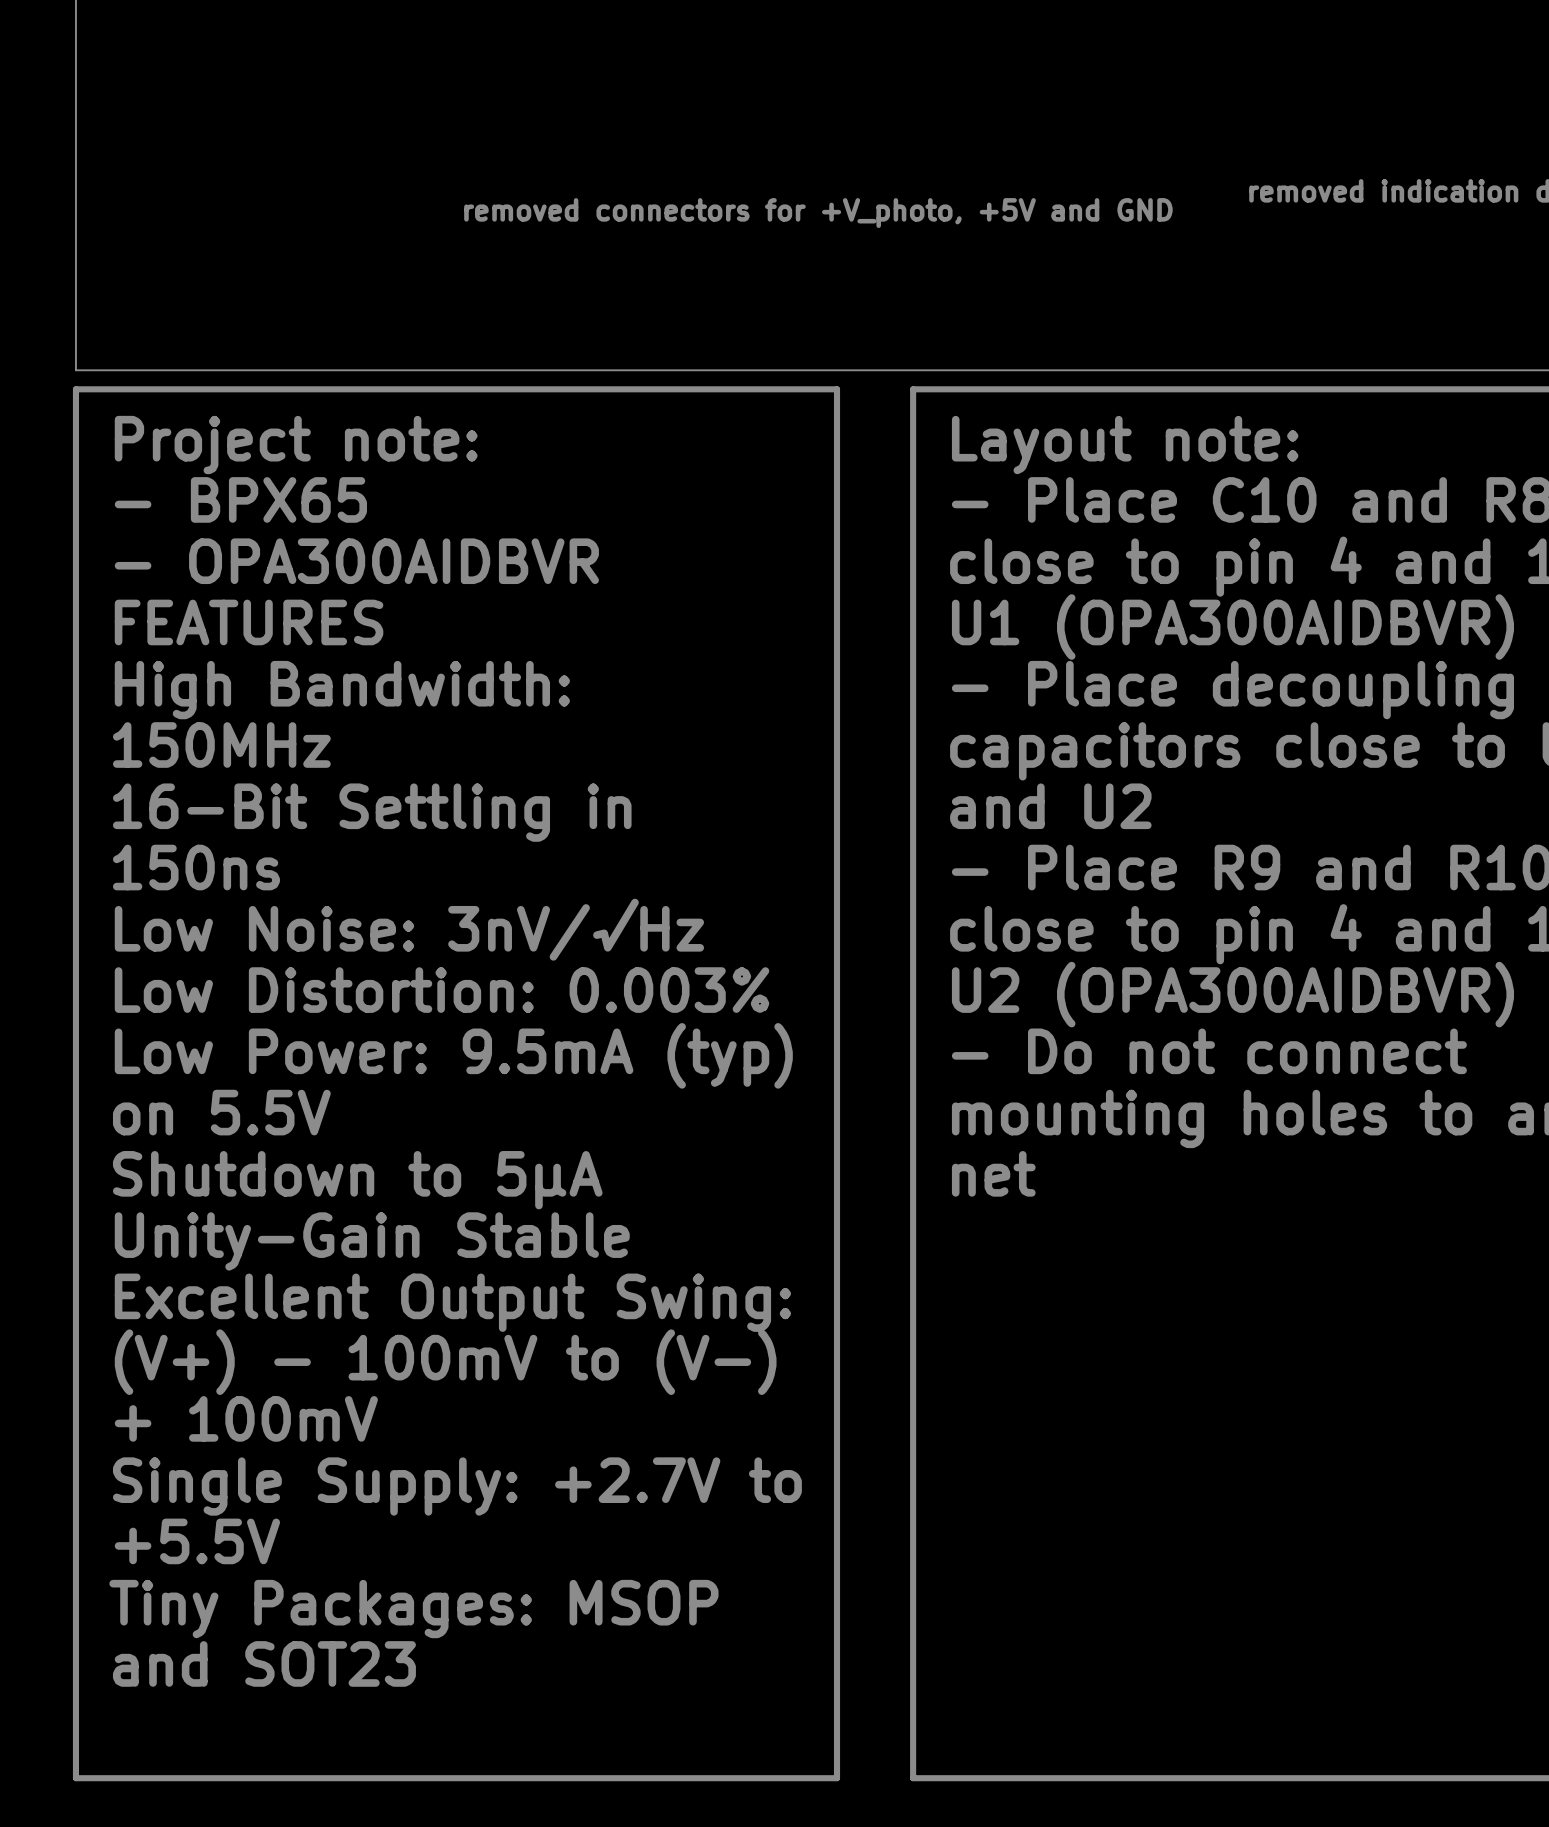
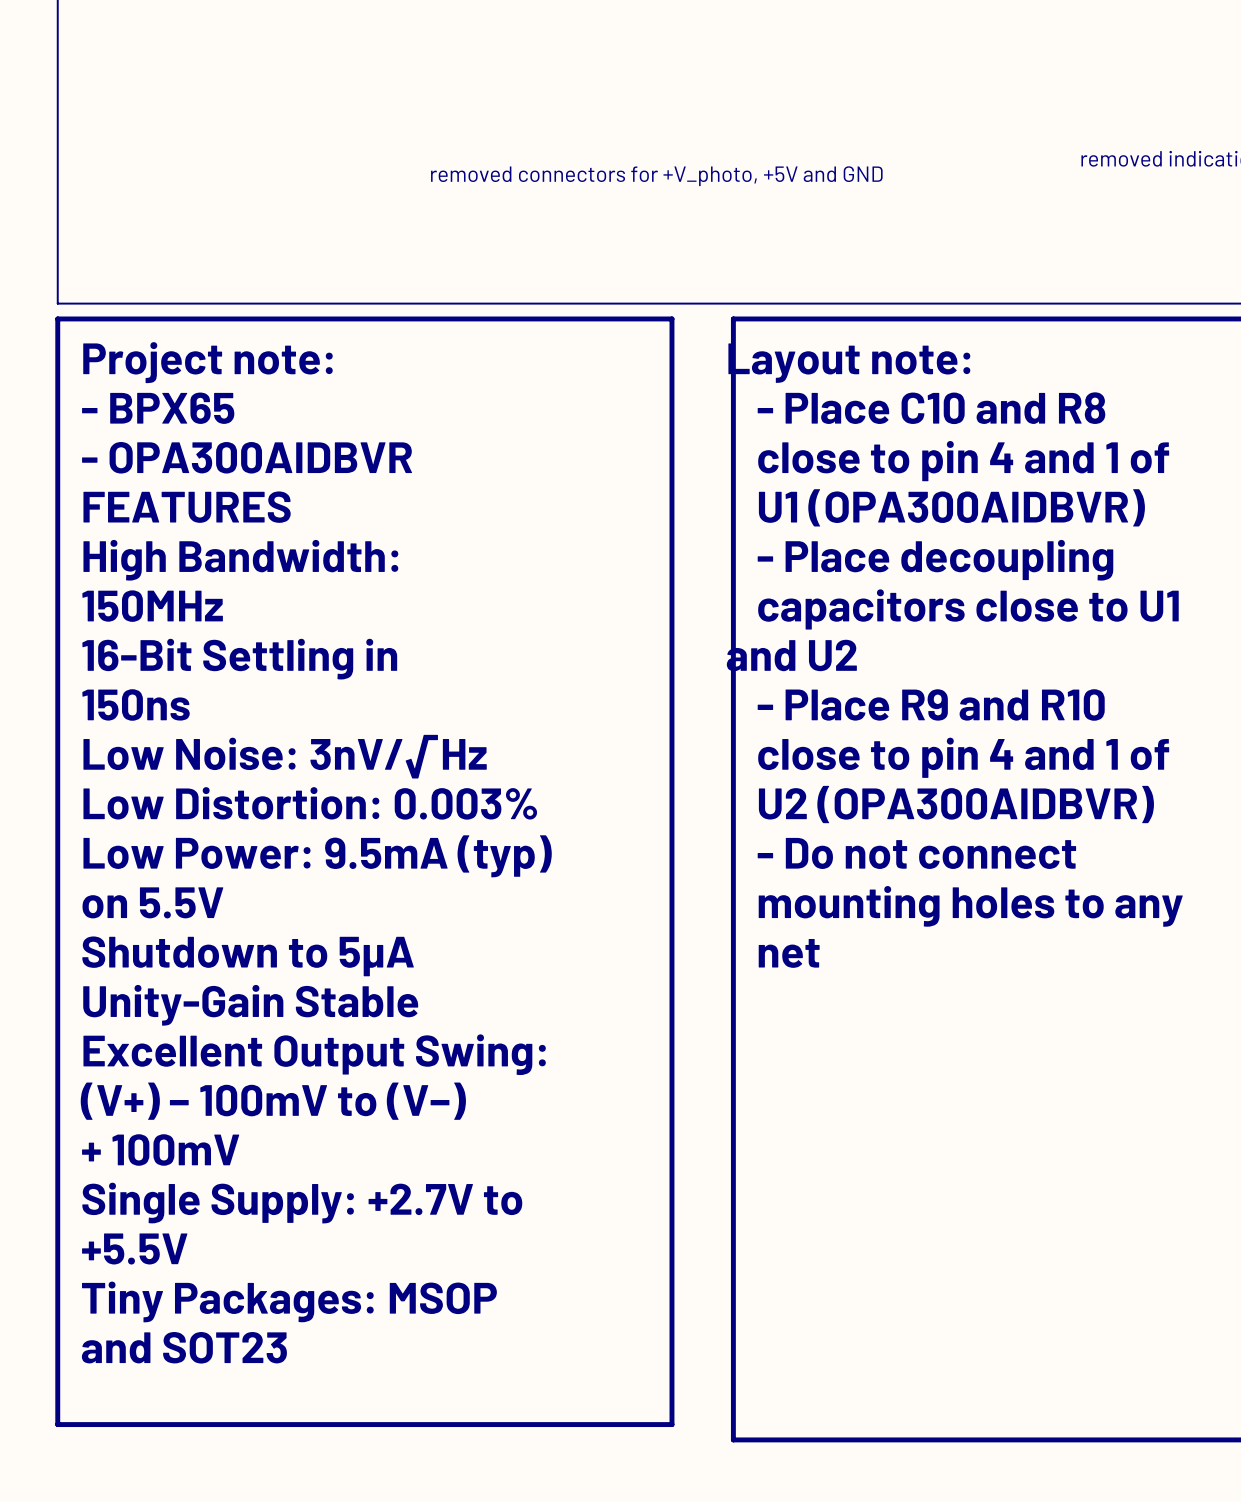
text position: Layout note: (1125, 445) -> Layout note: (849, 363)
text position: and U2 (1050, 806) -> and U2 (791, 655)
line: (75, 1759) (75, 1778) (837, 1778) (837, 1759) -> (57, 1424) (671, 1424)

